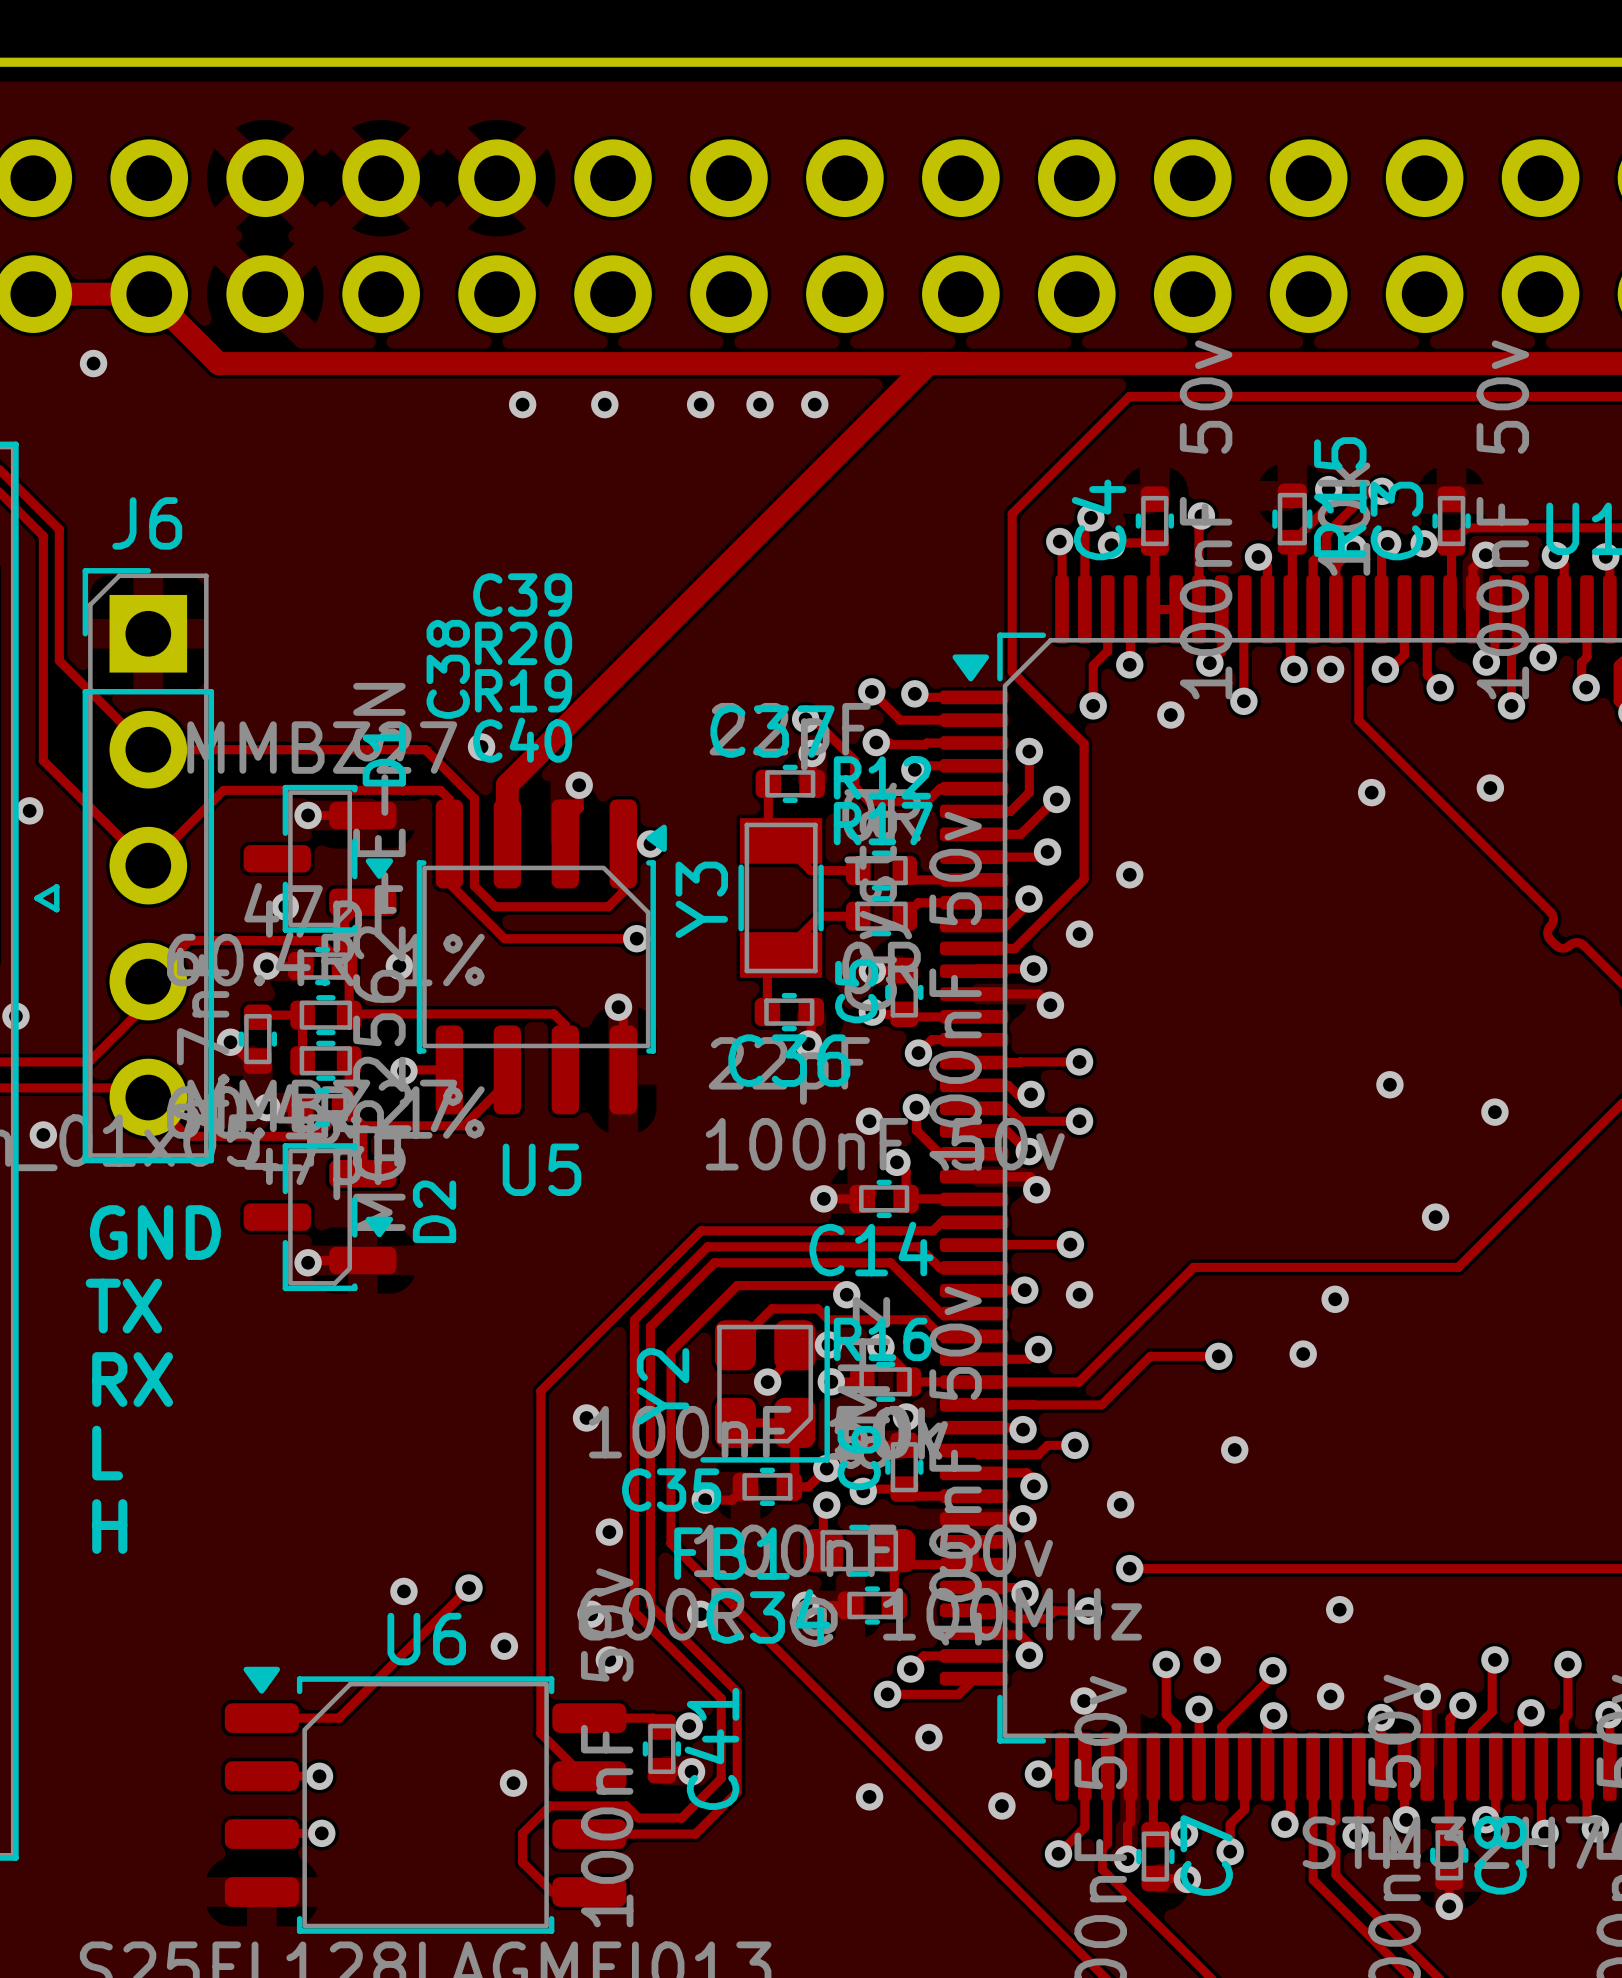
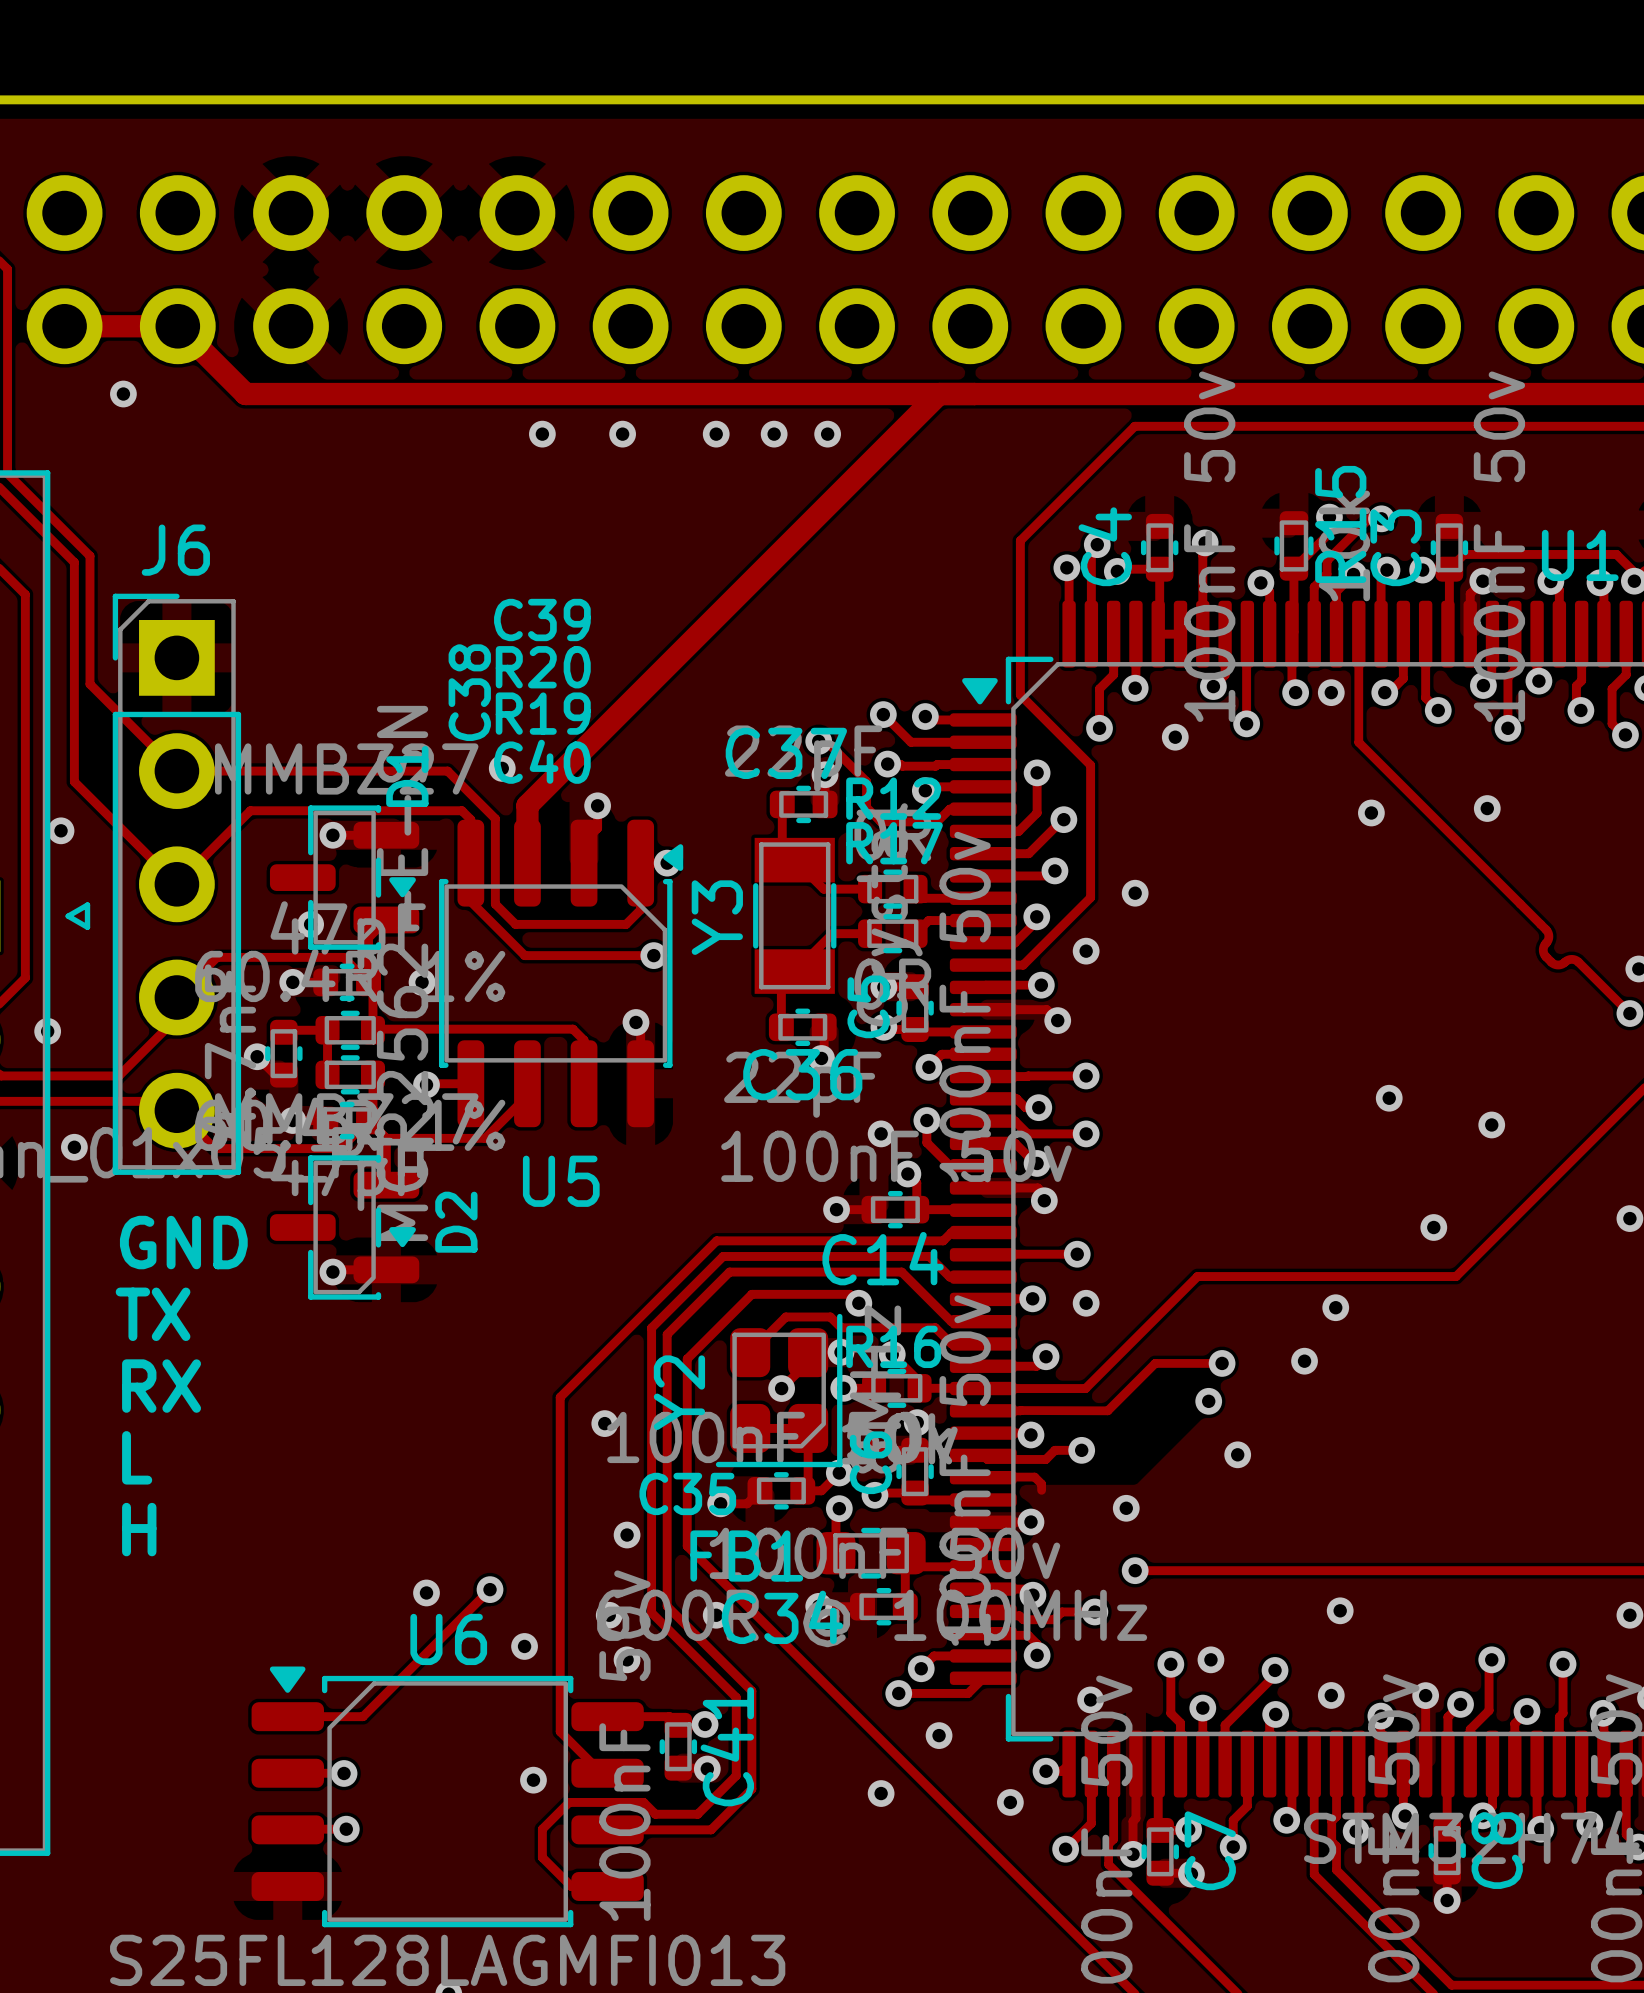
via position: (1033, 1486) -> (1208, 1401)

